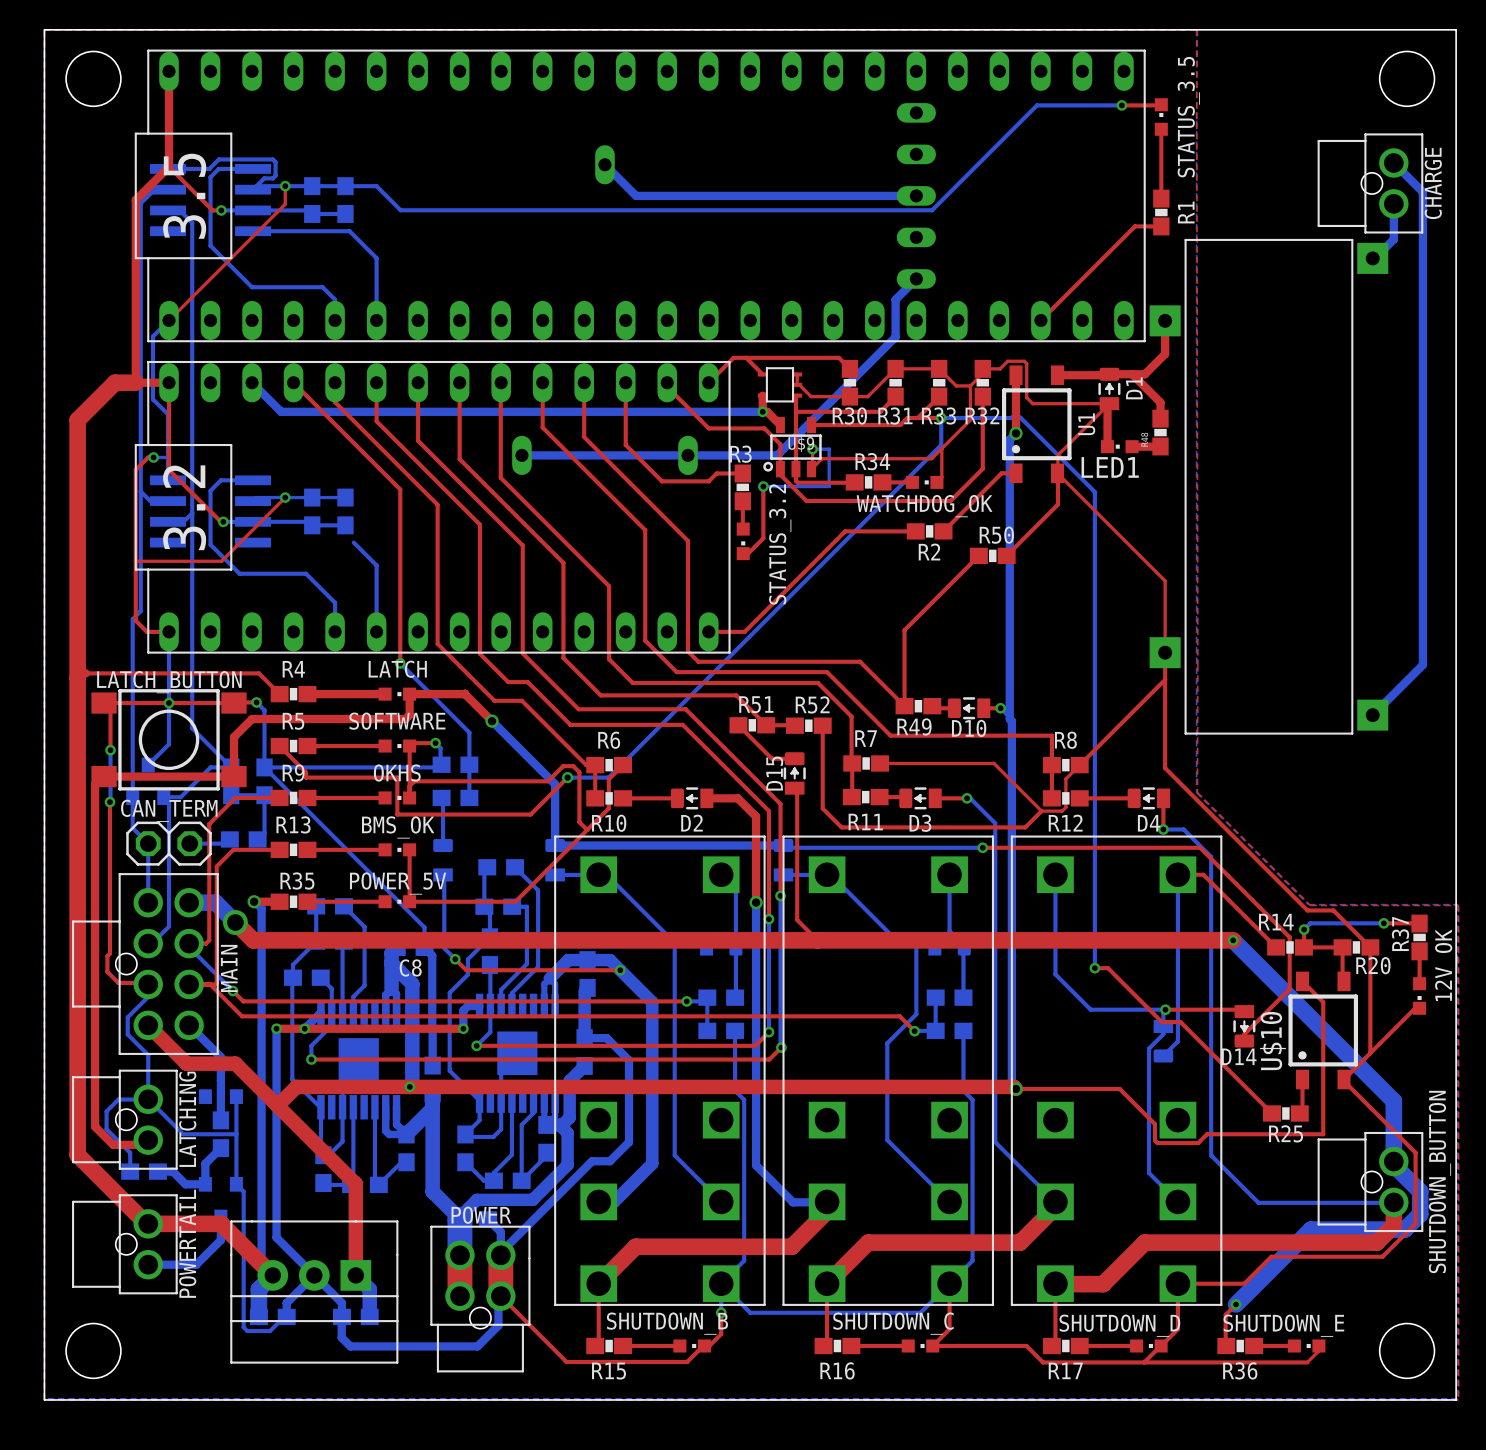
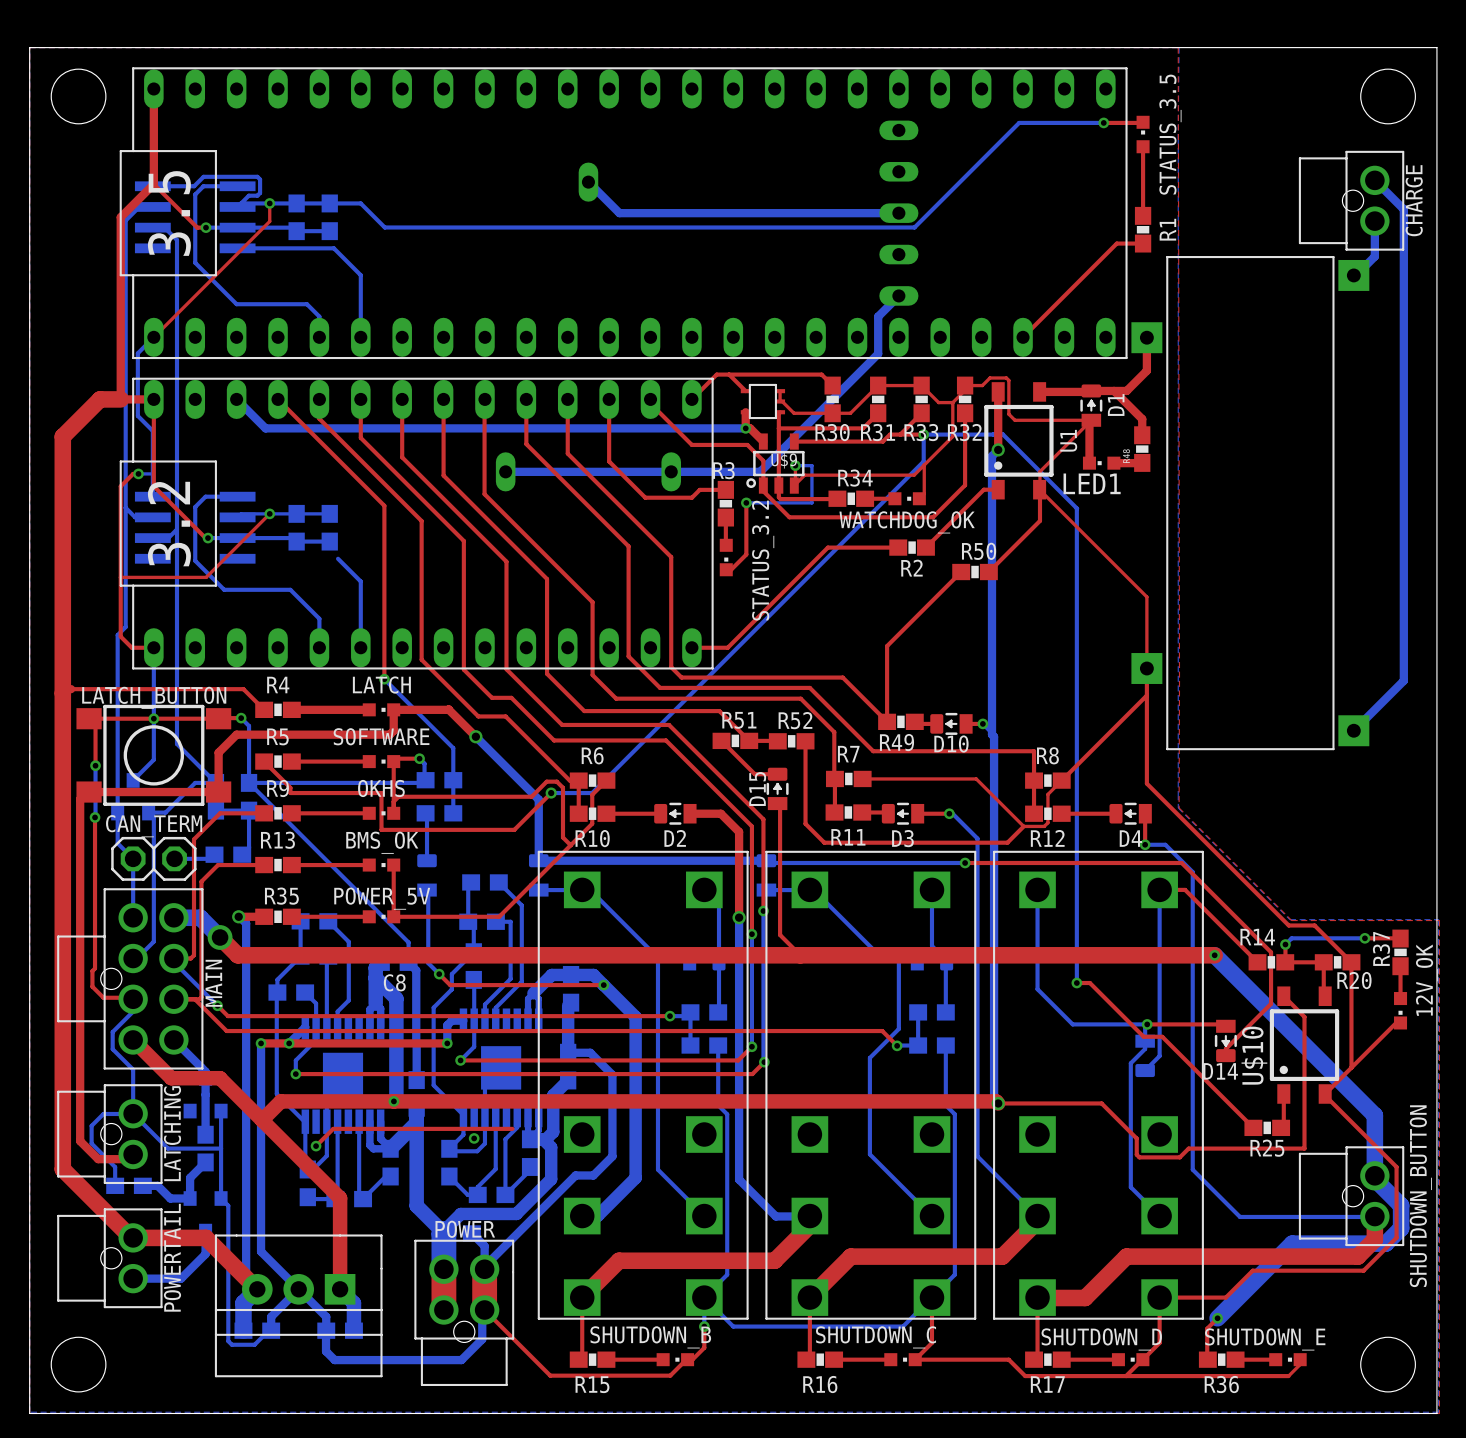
top track: none -> (512, 1128) (333, 1128) (316, 1146)
via: none -> (474, 1138)
via: none -> (316, 1146)

